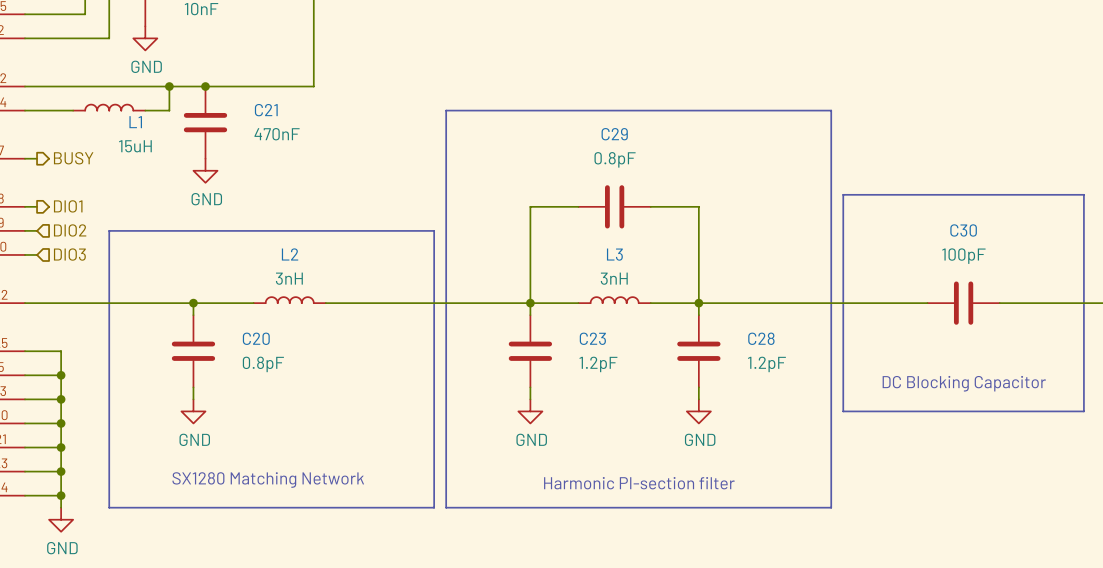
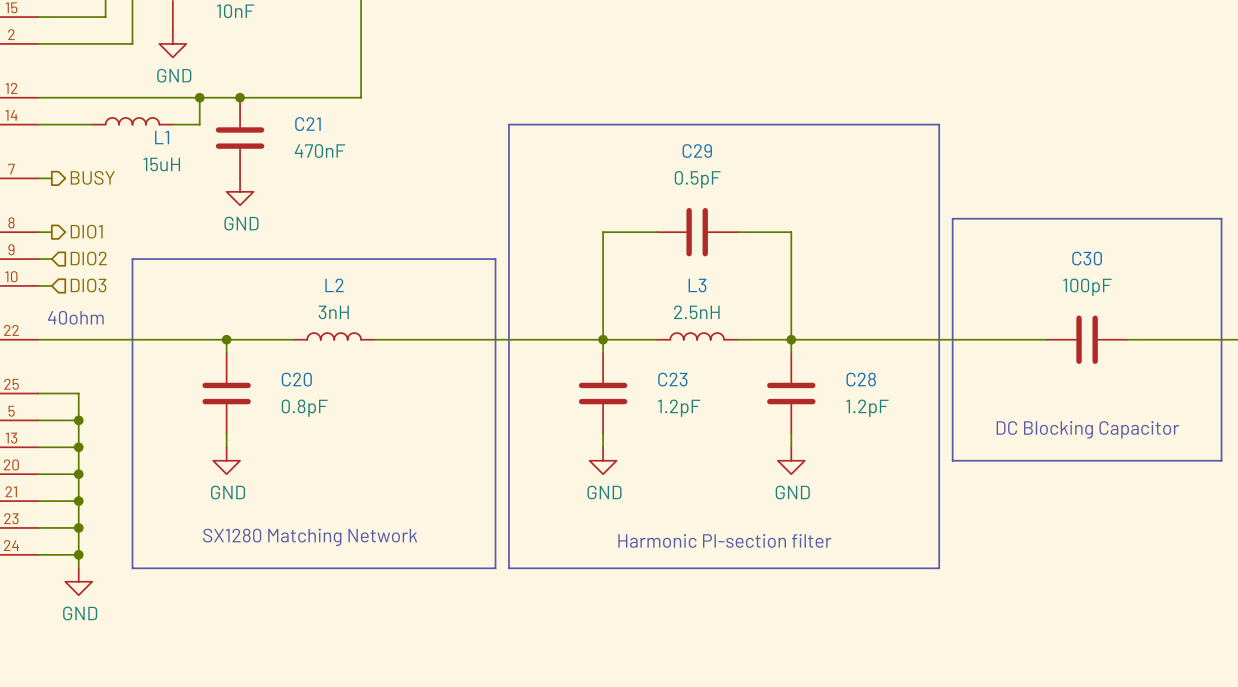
C29 value: 0.8pF (615, 159) -> 0.5pF (697, 179)
L3 value: 3nH (614, 278) -> 2.5nH (696, 312)
text: none -> 40ohm (75, 317)

